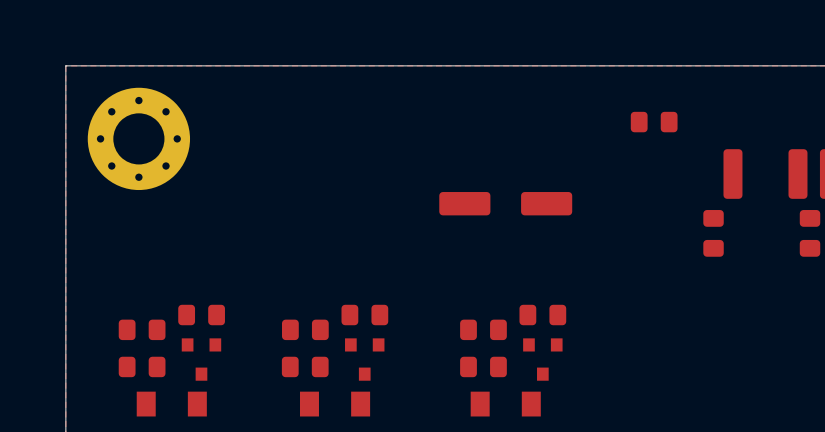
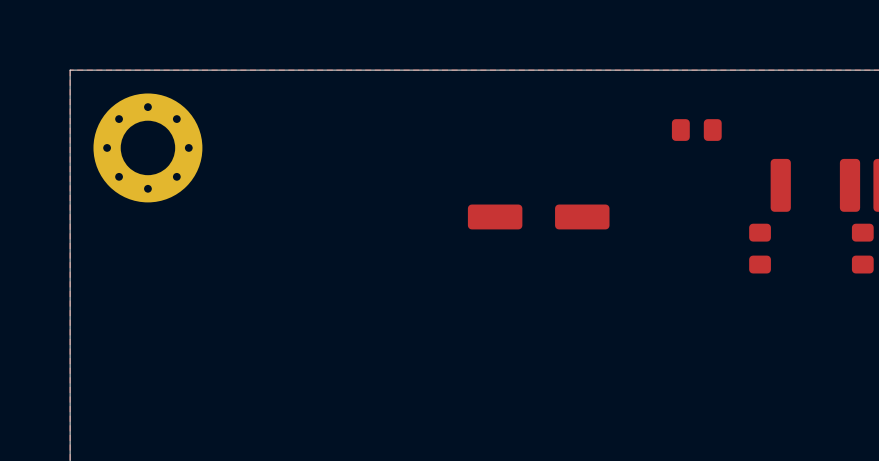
part: (201, 315) -> none
part: (364, 315) -> none
part: (542, 315) -> none
part: (142, 329) -> none
part: (305, 329) -> none
part: (483, 329) -> none
part: (201, 359) -> none
part: (364, 359) -> none
part: (542, 359) -> none
part: (142, 366) -> none
part: (305, 366) -> none
part: (483, 366) -> none
part: (171, 404) -> none
part: (335, 404) -> none
part: (505, 404) -> none

